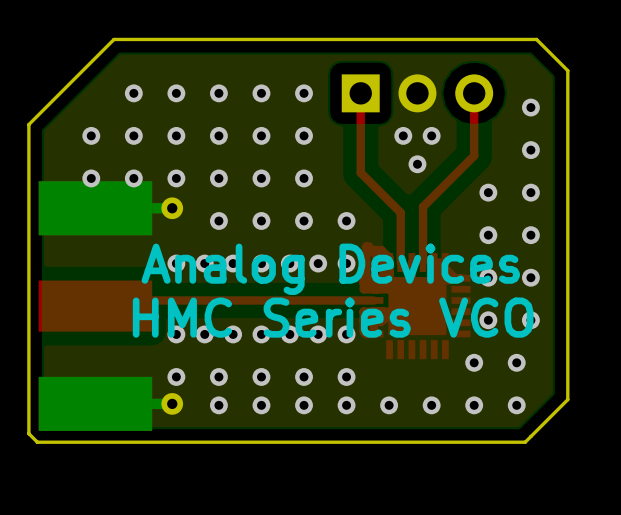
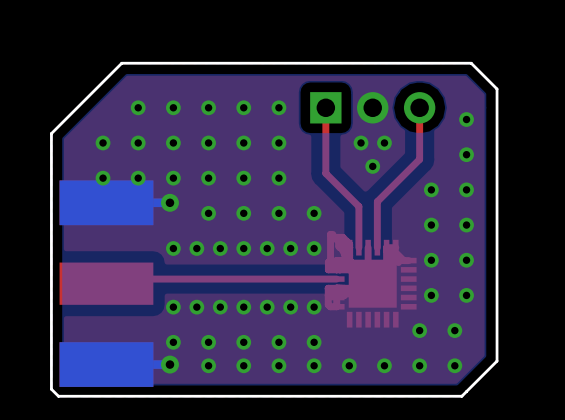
text: Analog Devices (330, 269) -> none
text: HMC Series VCO (333, 317) -> none

